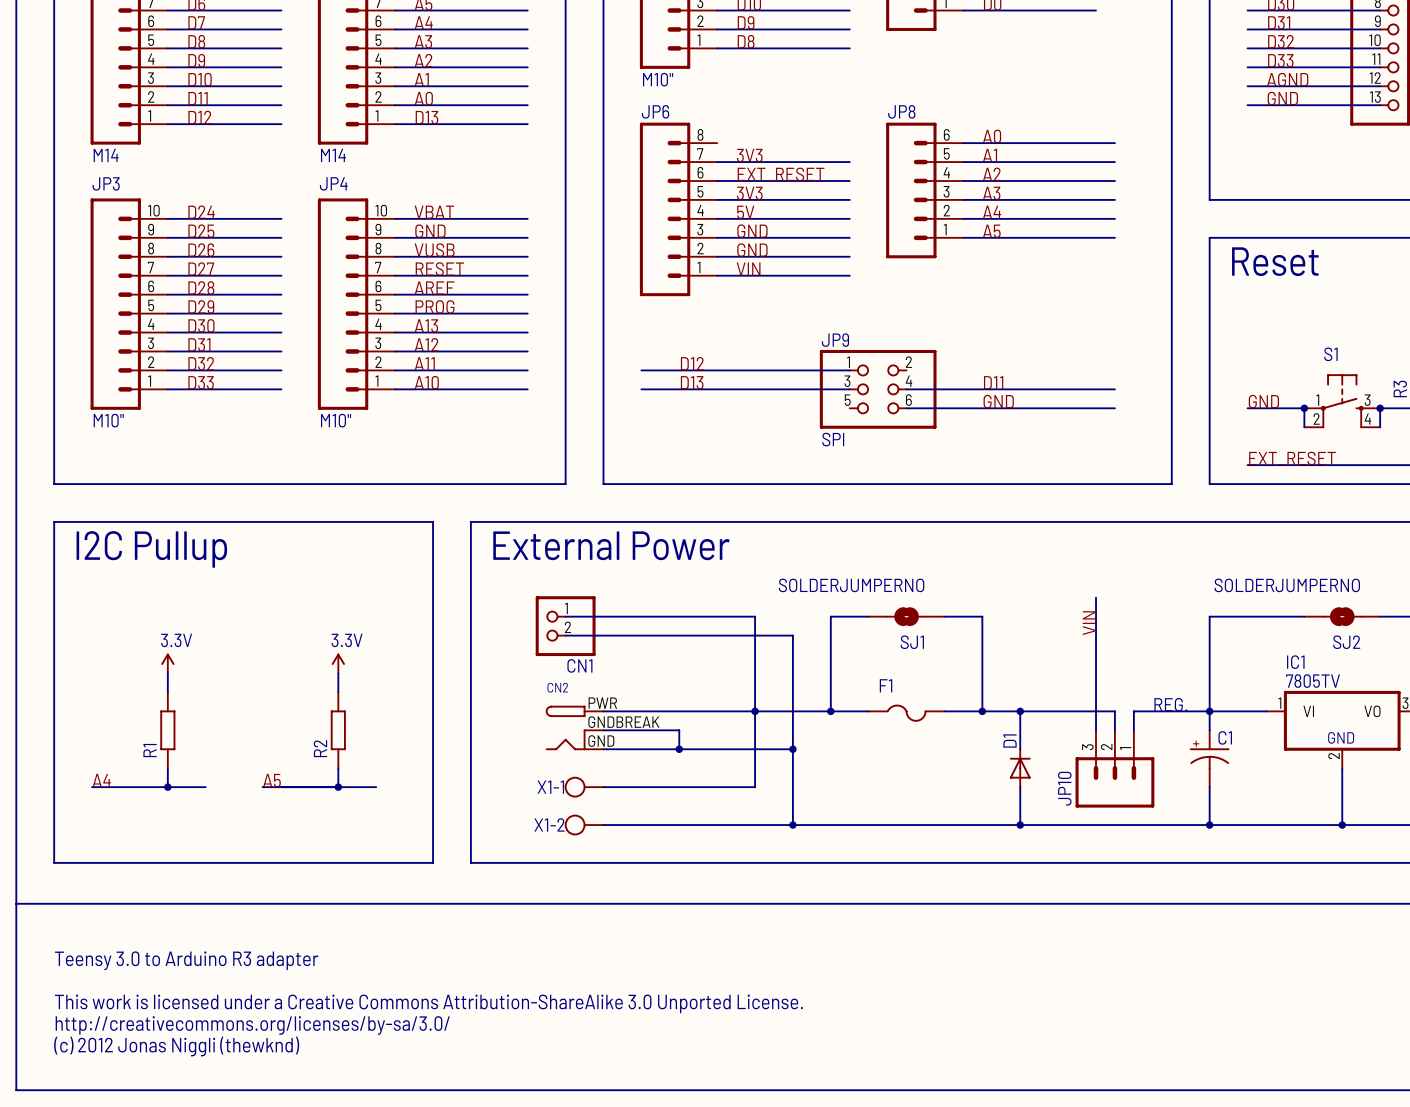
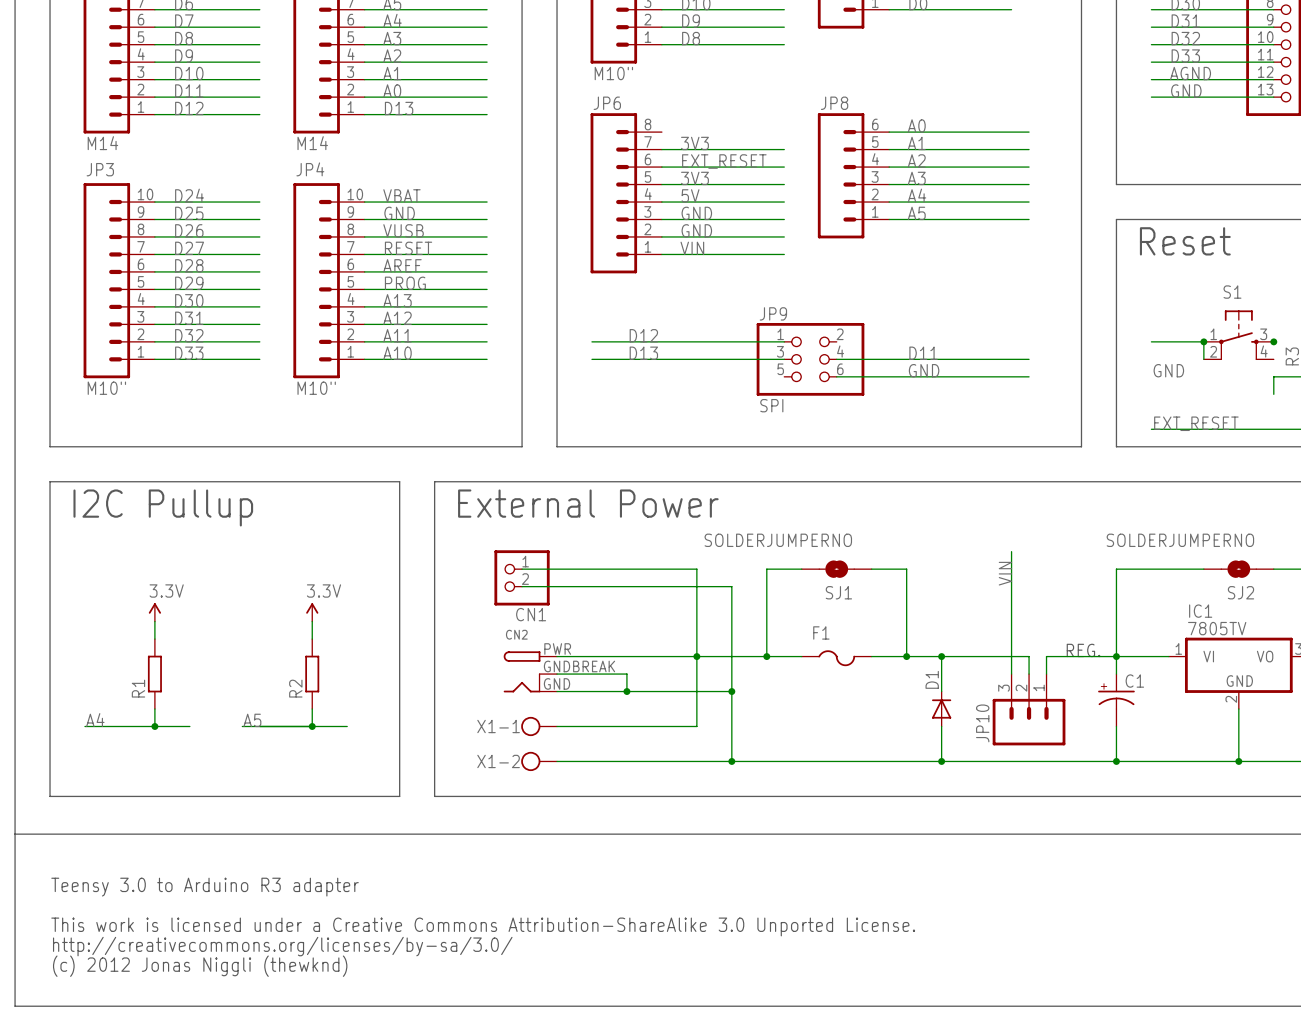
junction: none -> (1273, 341)
S1 position: (1342, 401) -> (1238, 335)
wire: (1247, 408) (1304, 408) (1304, 427) -> (1151, 341) (1203, 341) (1203, 359)
junction position: (1304, 408) -> (1203, 341)
junction: (1380, 408) -> none

